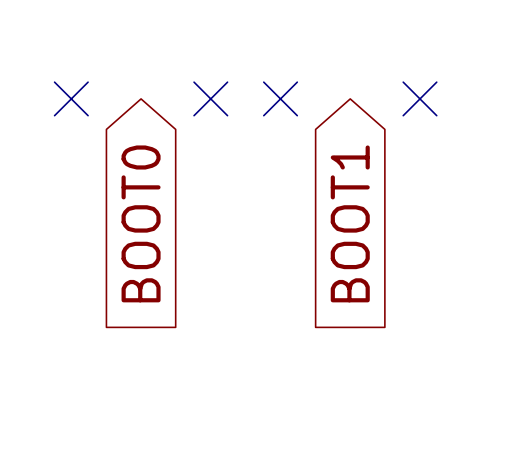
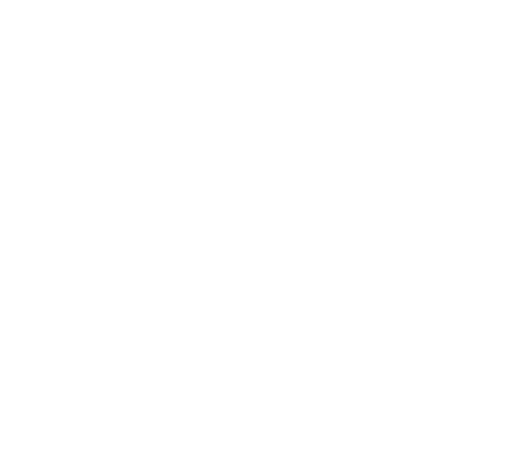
no-connect mark: (71, 98) -> none
no-connect mark: (210, 98) -> none
no-connect mark: (280, 98) -> none
no-connect mark: (419, 98) -> none
global label: BOOT0 (141, 223) -> none
global label: BOOT1 (350, 223) -> none

